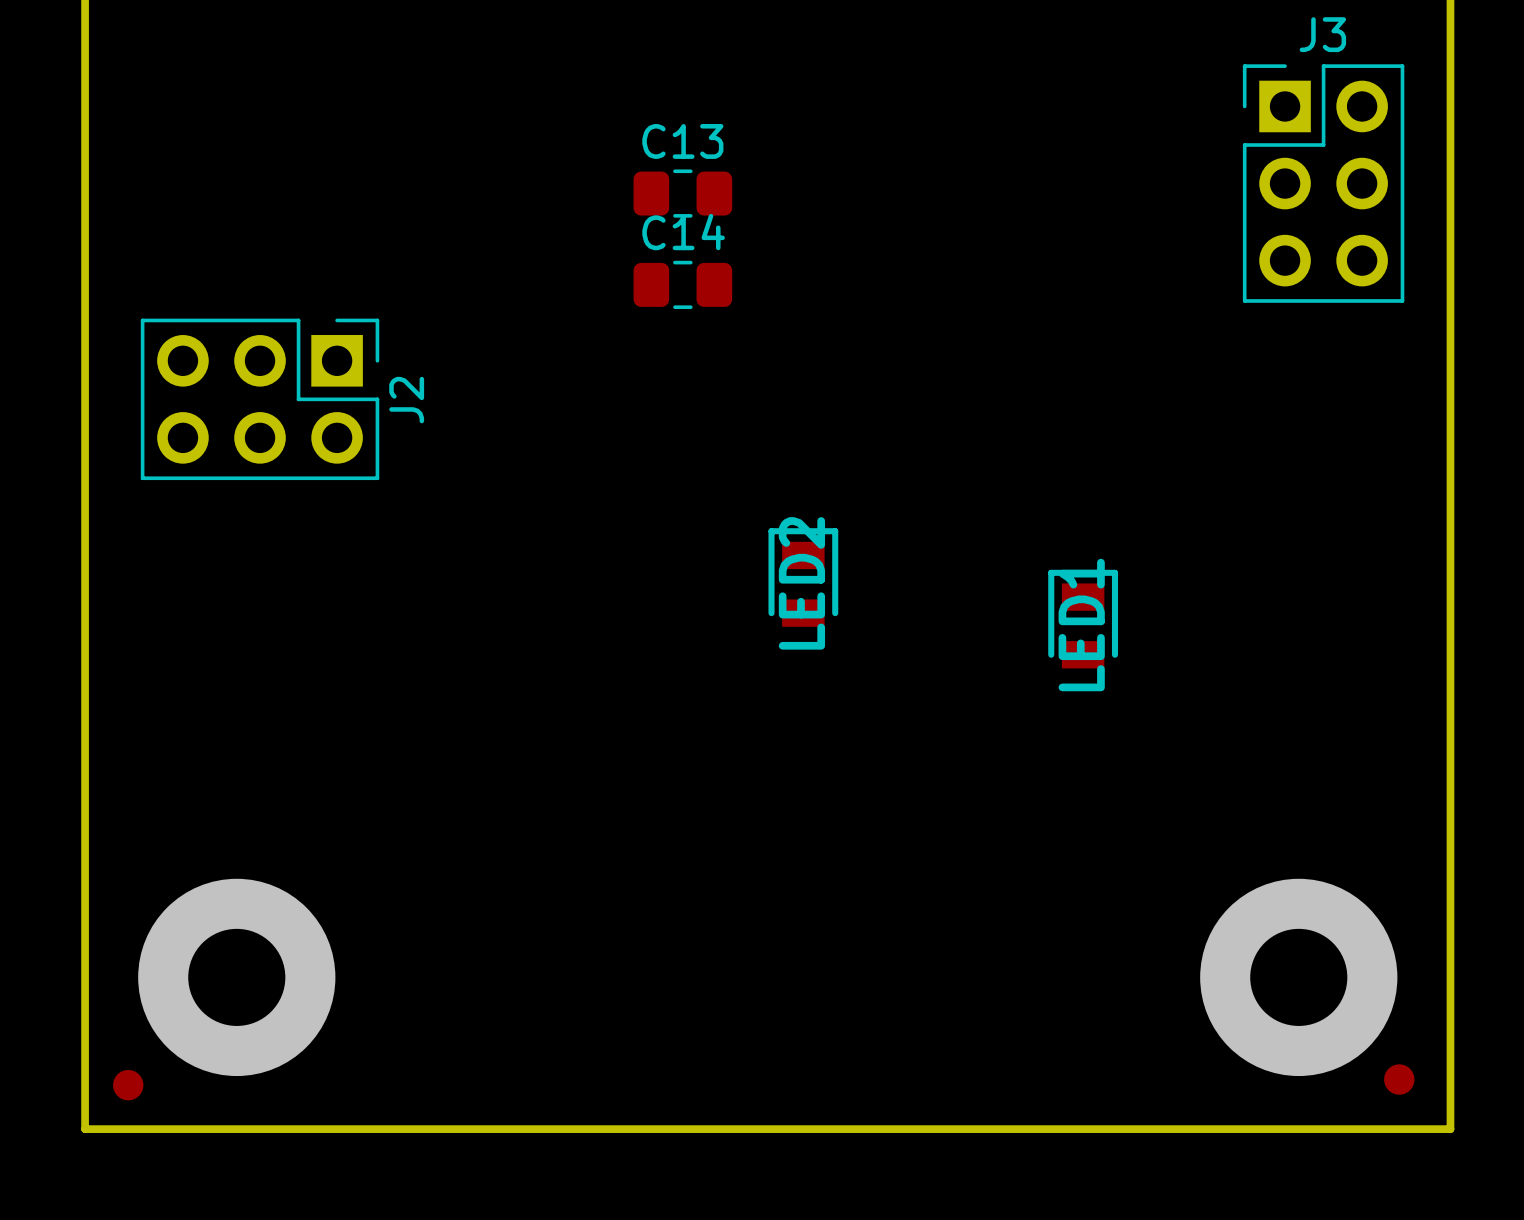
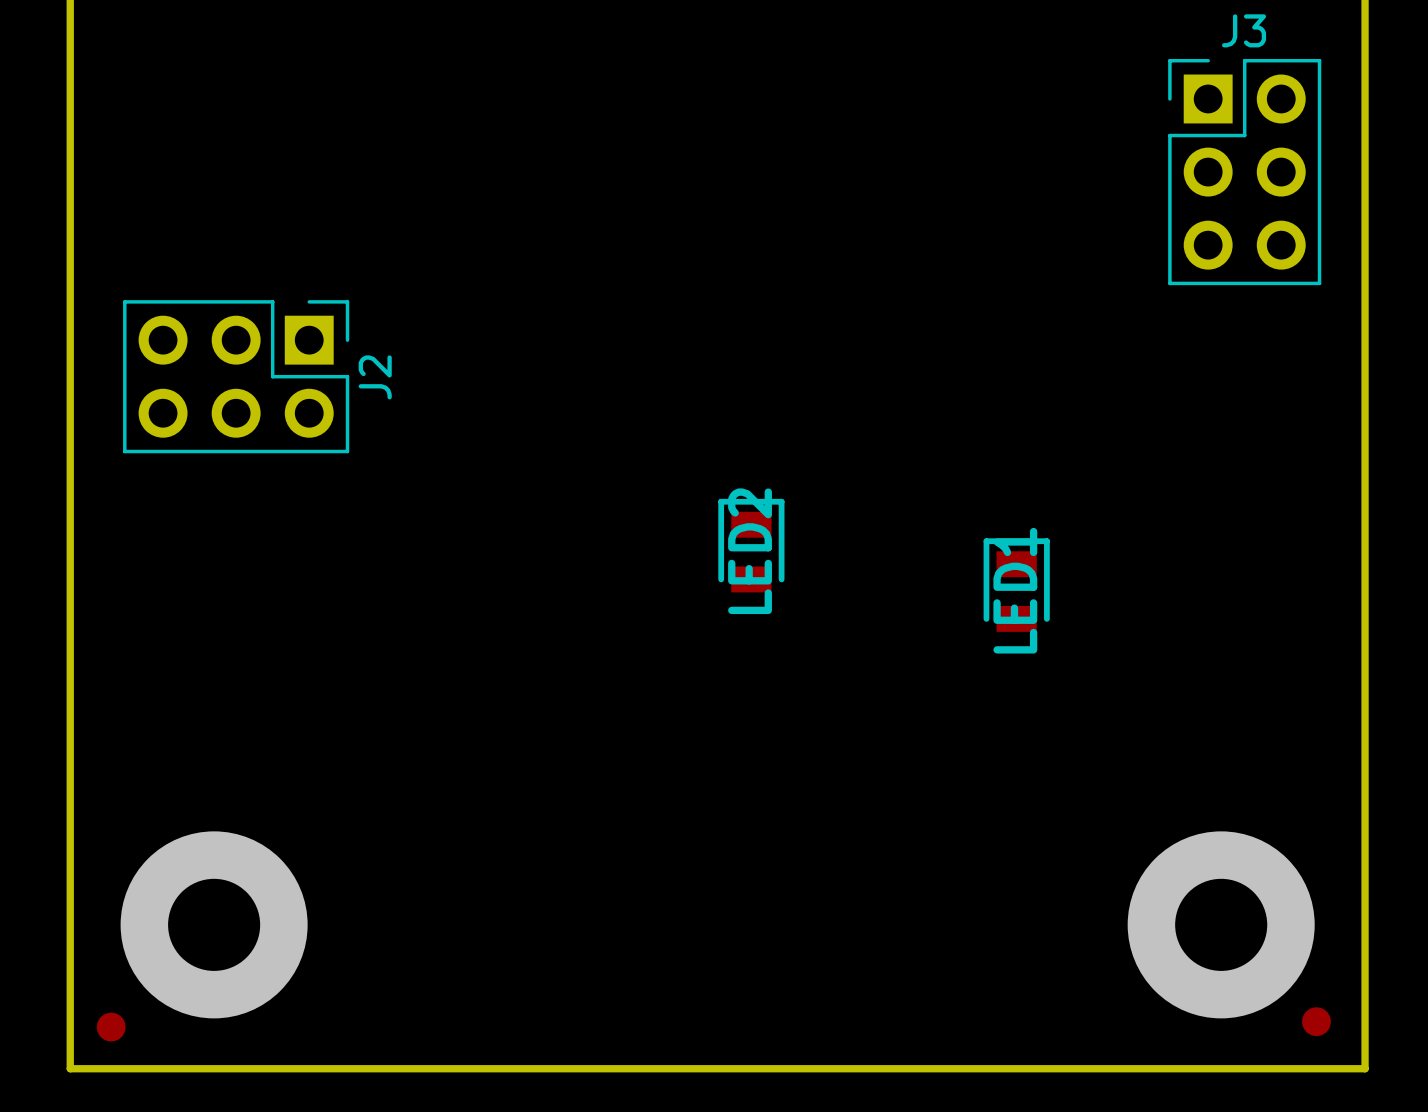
C13: (682, 193) -> none
C14: (682, 284) -> none

